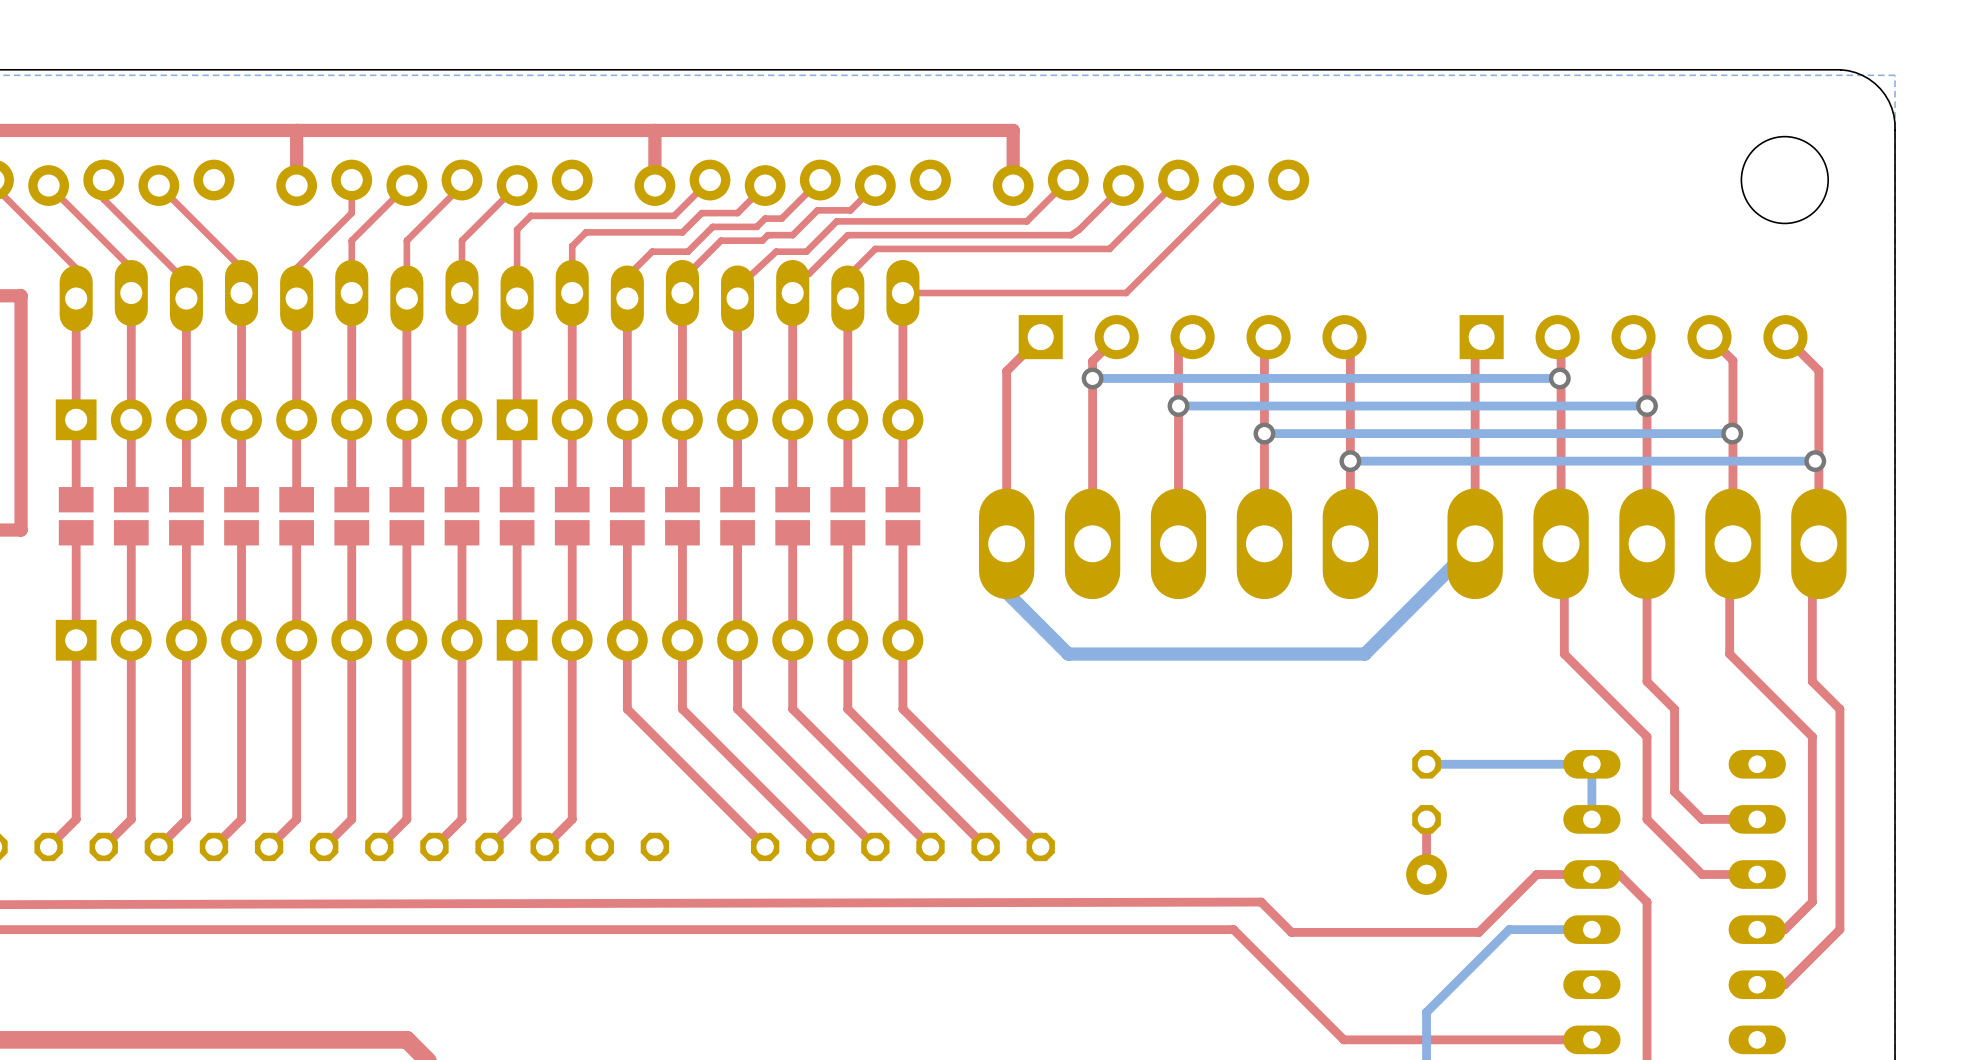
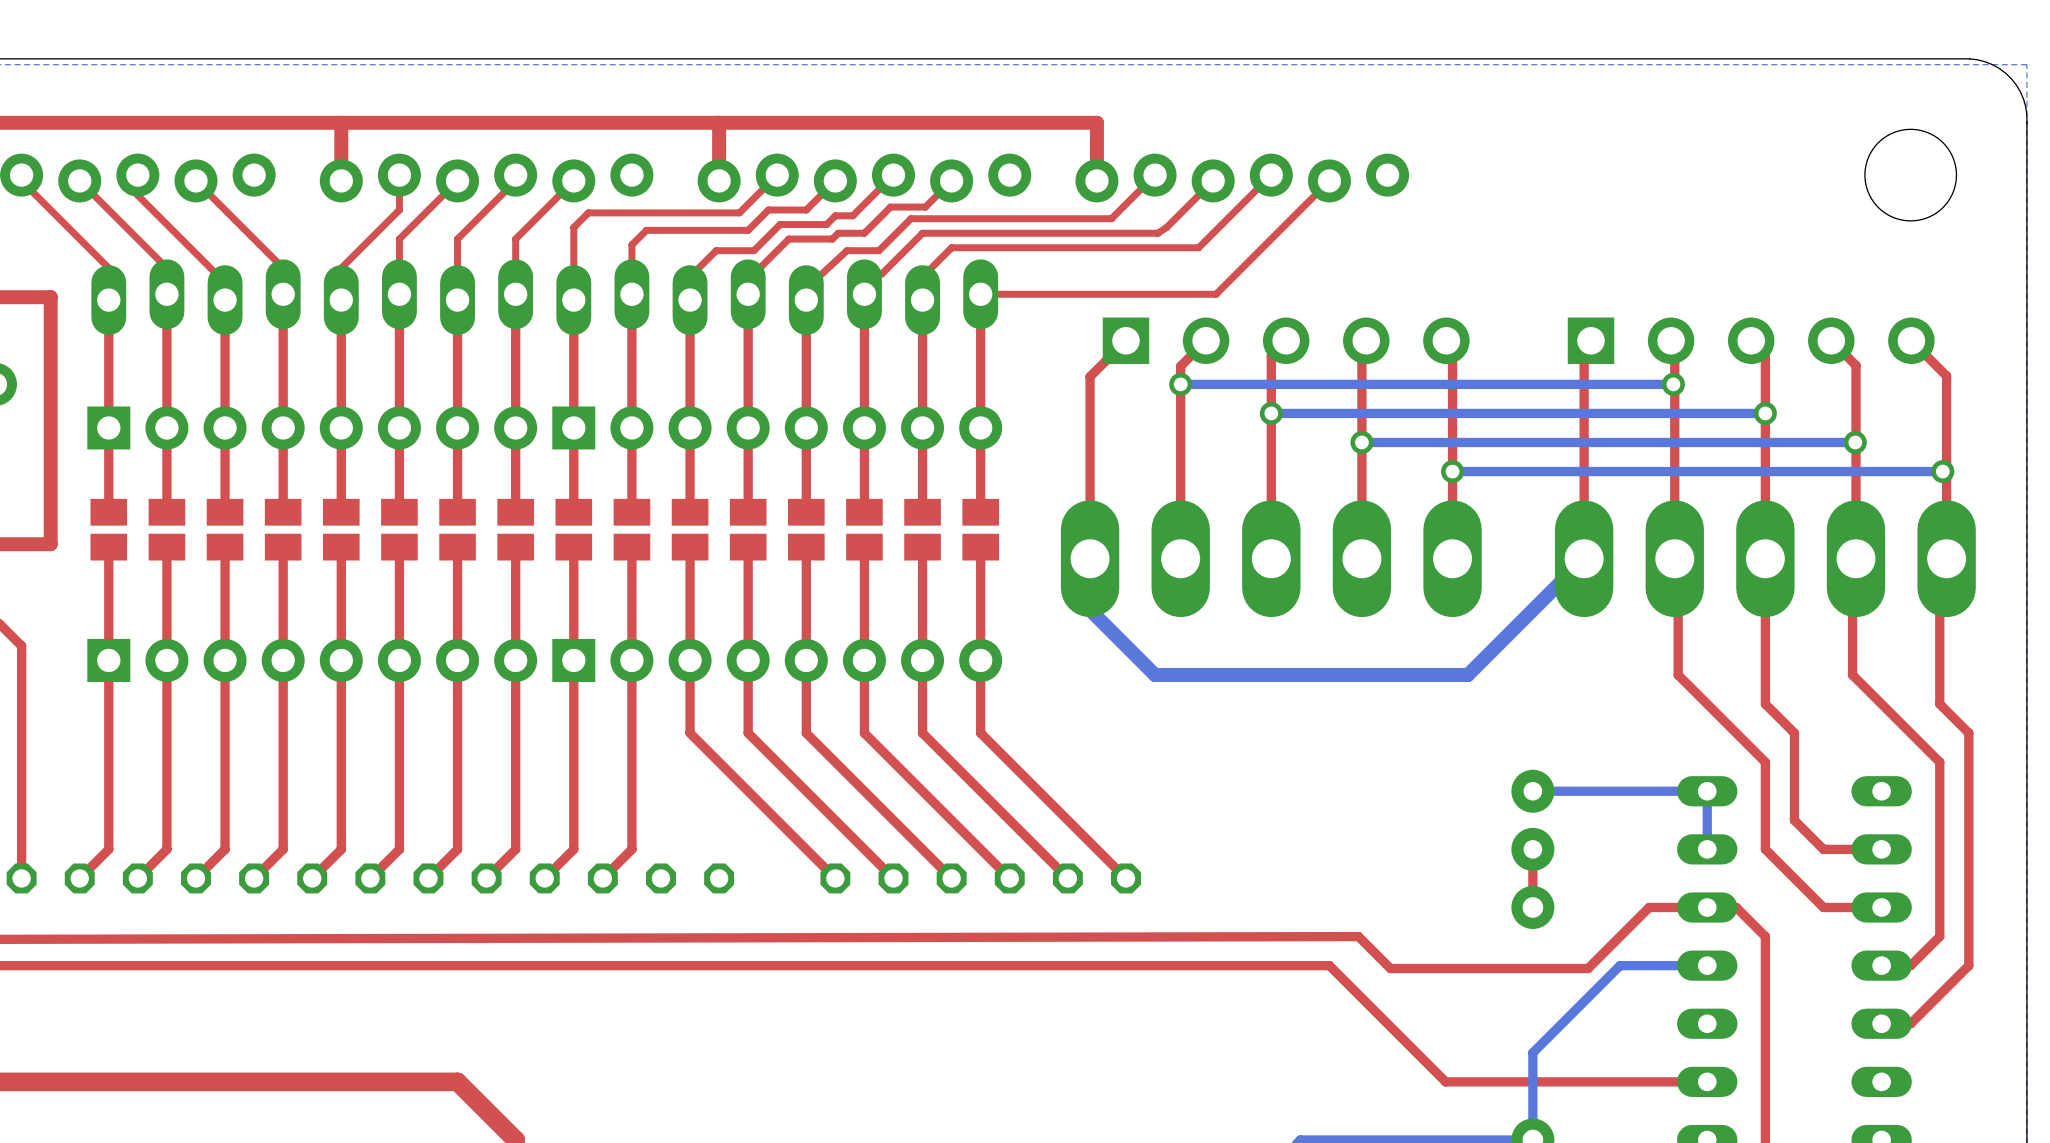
part footprint: [1412, 749, 1441, 834] -> [1511, 769, 1555, 871]

